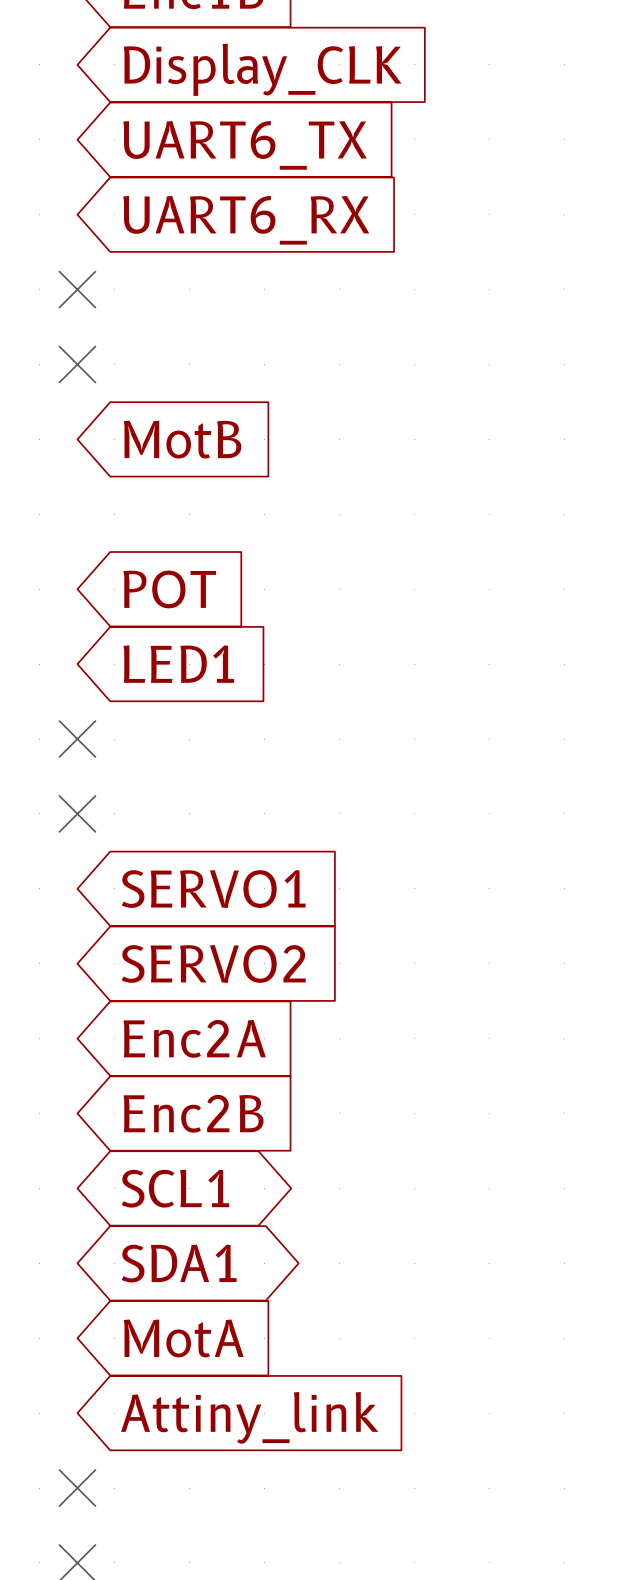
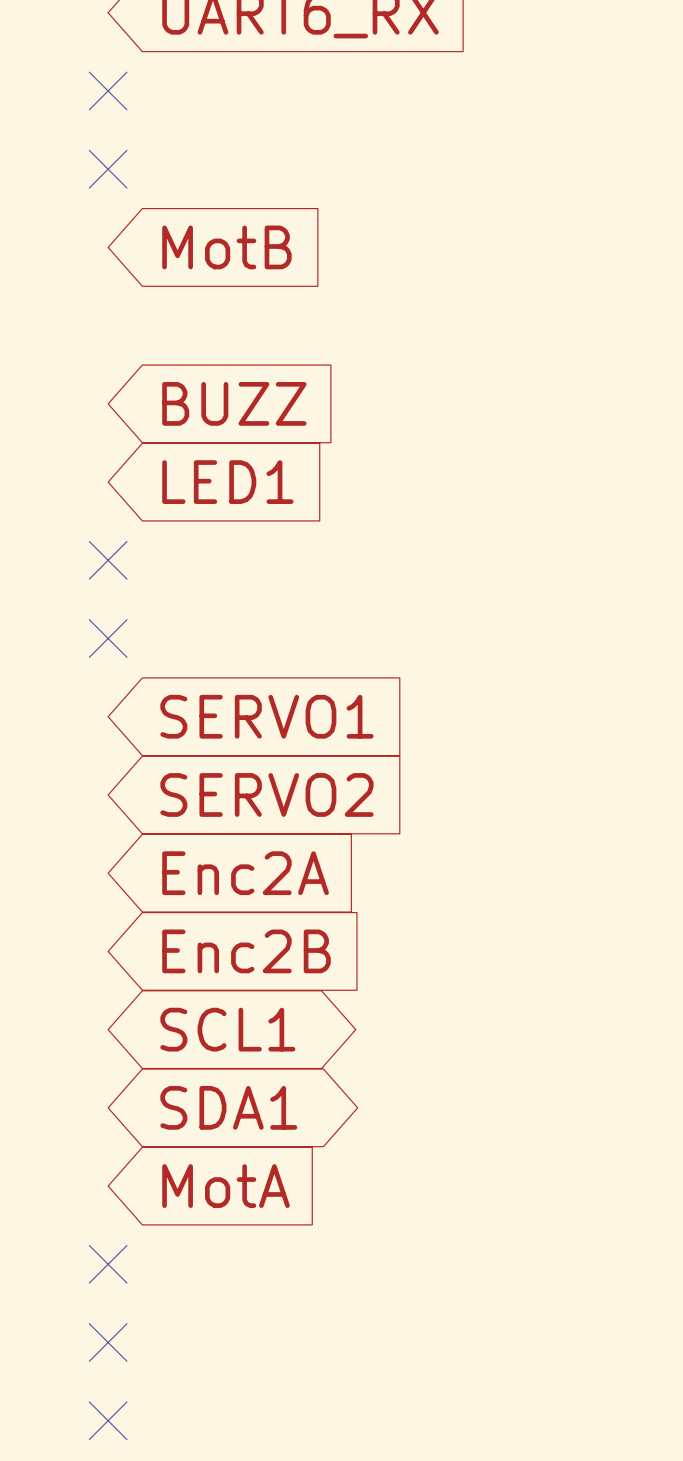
global label: POT (169, 589) -> BUZZ (234, 403)
no-connect mark: none -> (108, 1264)
global label: Attiny_link (249, 1417) -> none

